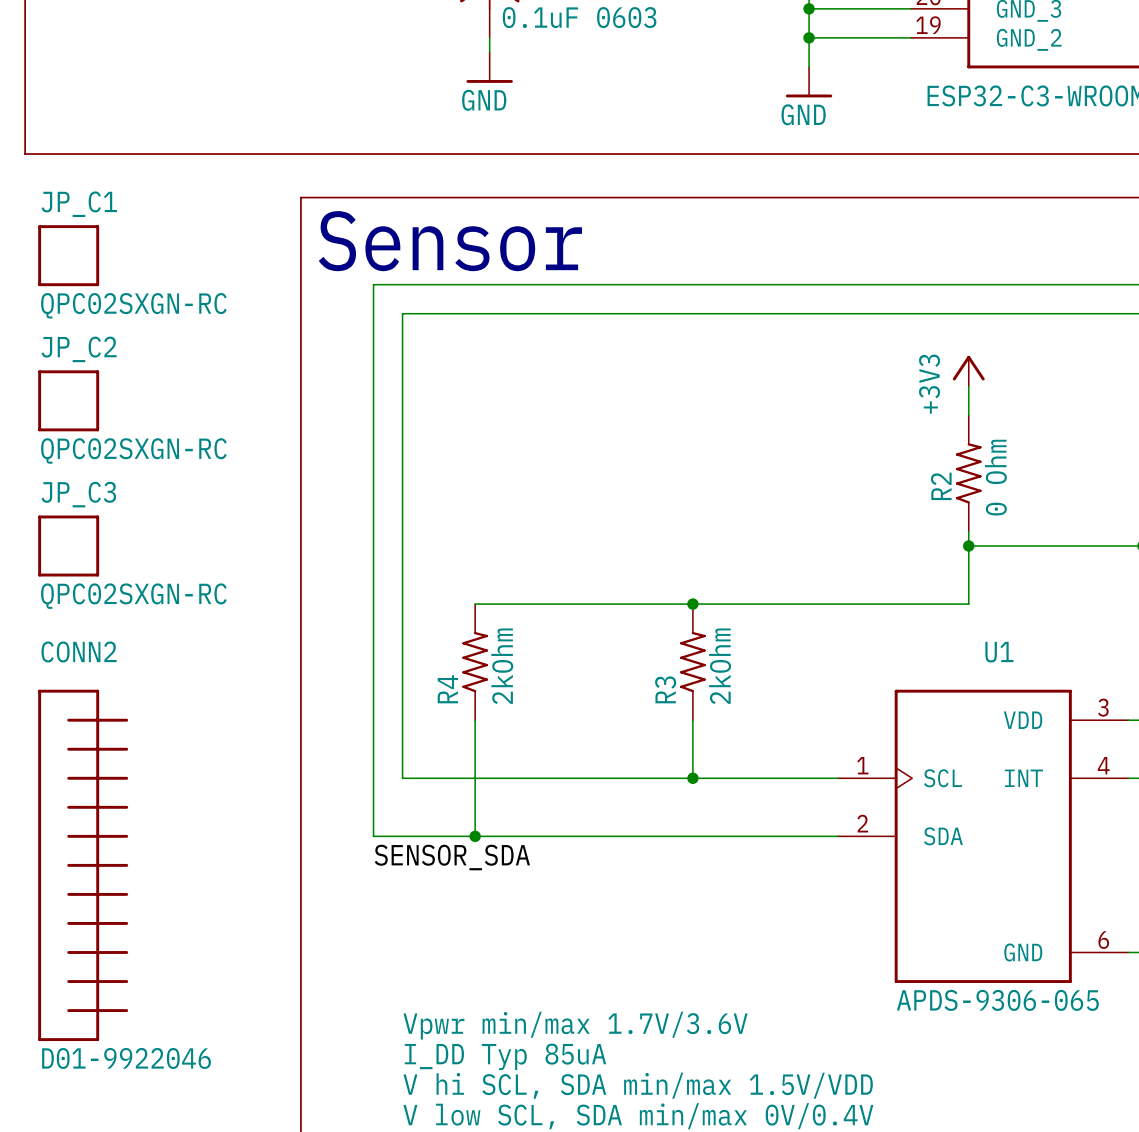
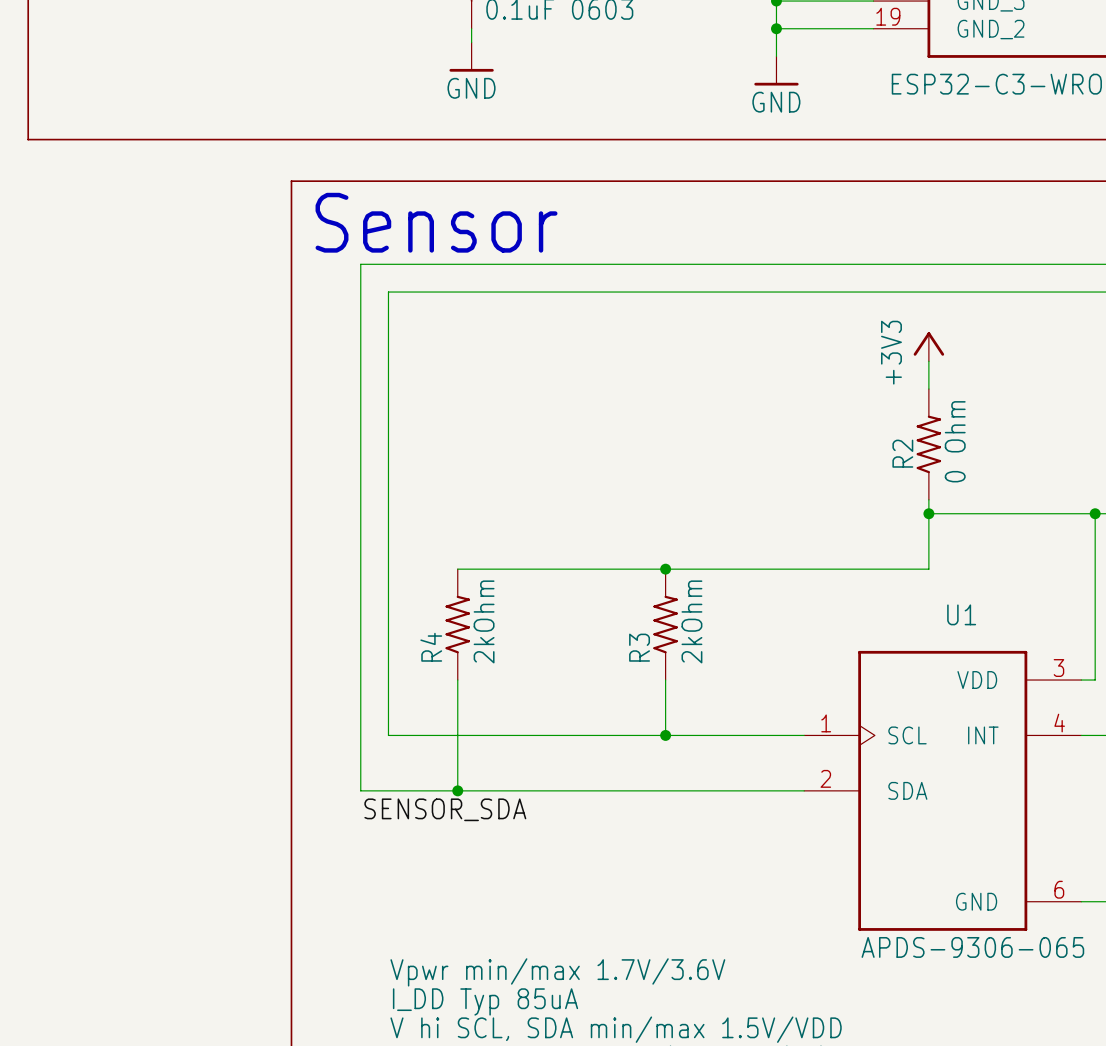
JP_C1: QPC02SXGN-RC (68, 255) -> none
JP_C2: QPC02SXGN-RC (68, 400) -> none
JP_C3: QPC02SXGN-RC (68, 546) -> none
CONN2: D01-9922046 (83, 865) -> none

